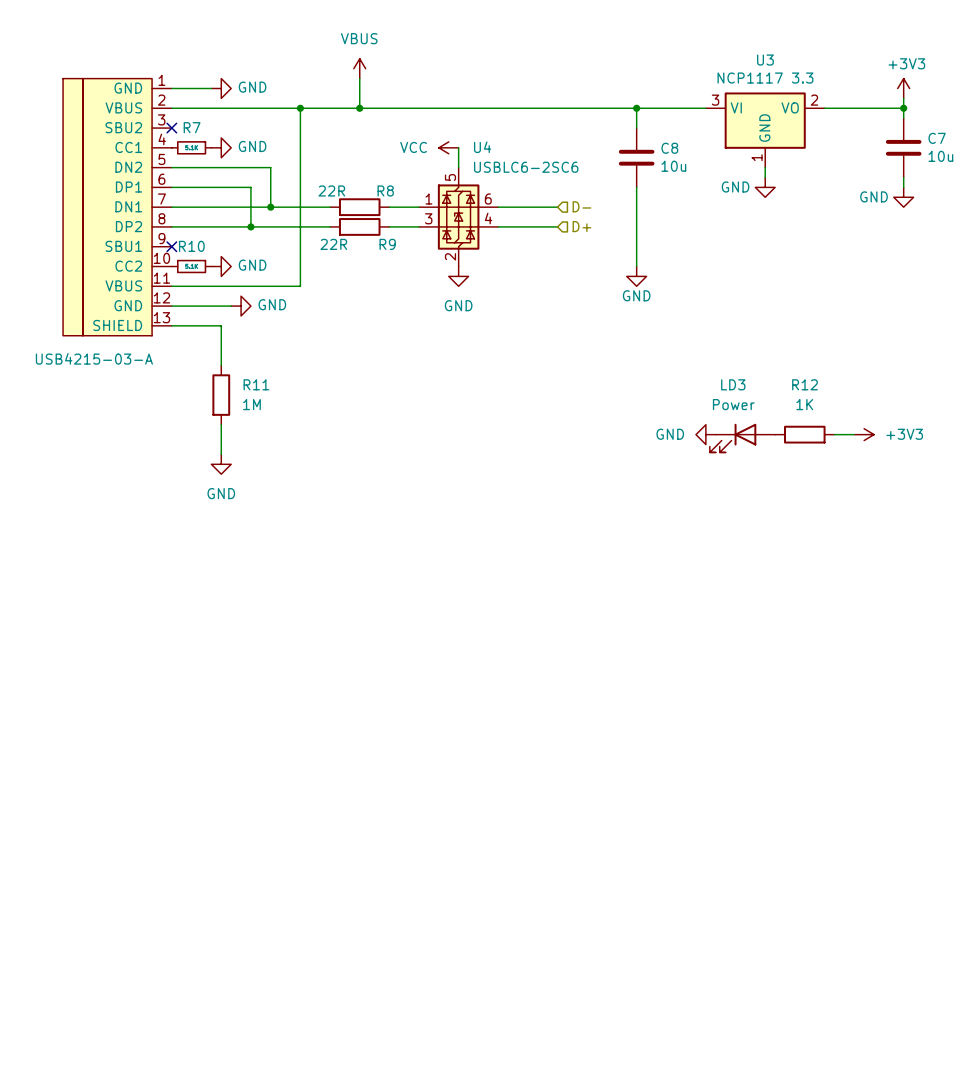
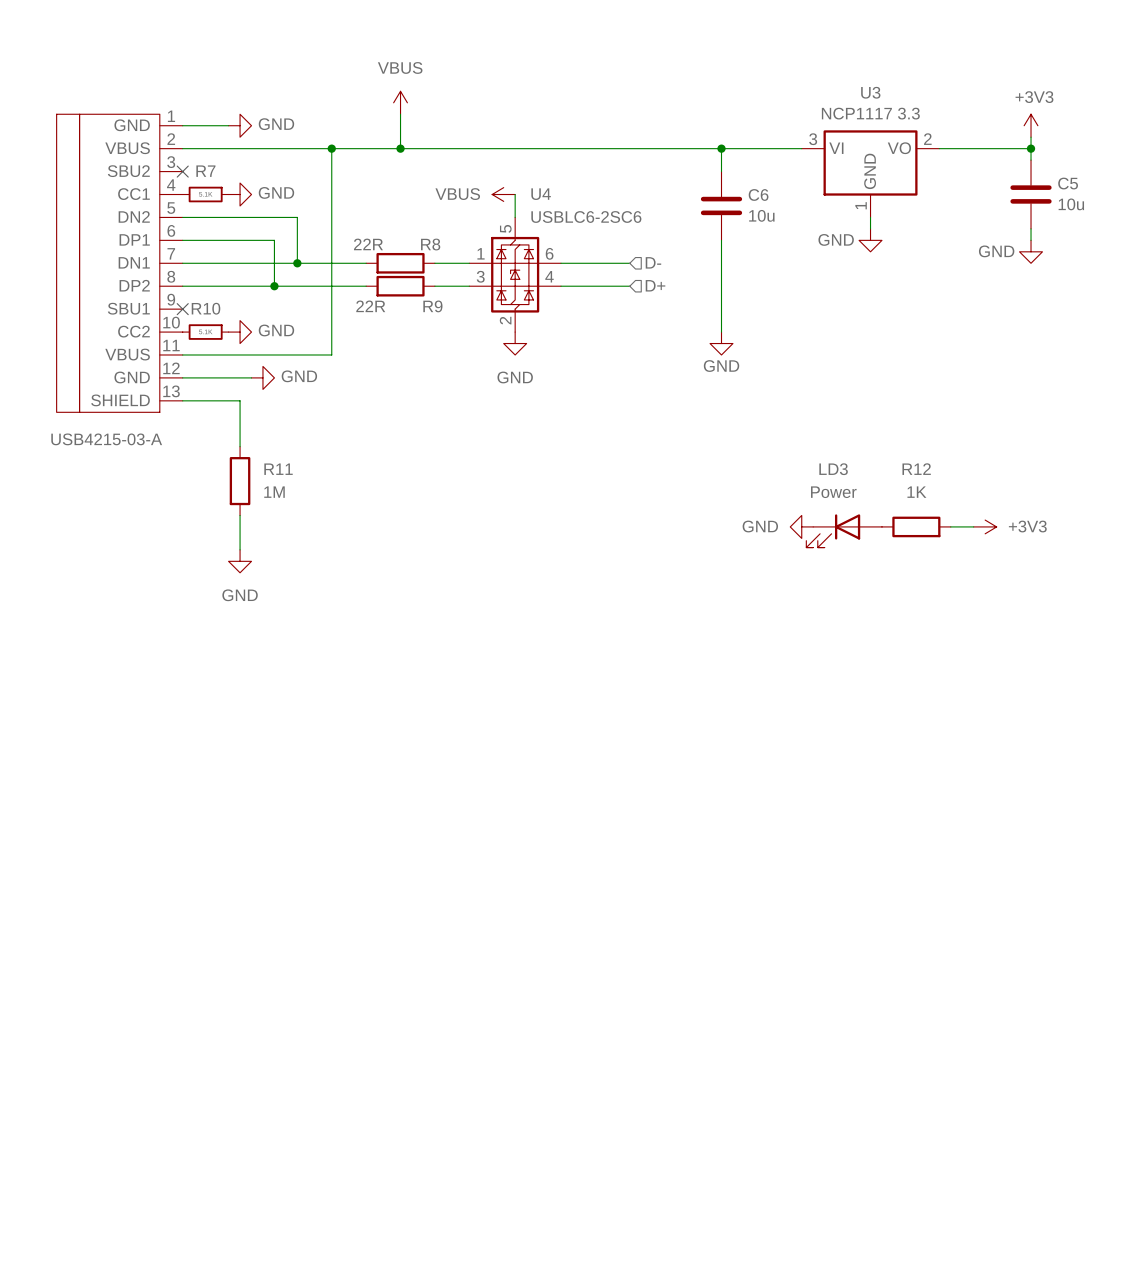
C7 name: C7 (937, 138) -> C5 (1068, 183)
power symbol: VCC (448, 147) -> VBUS (503, 194)
C8 name: C8 (669, 148) -> C6 (758, 194)

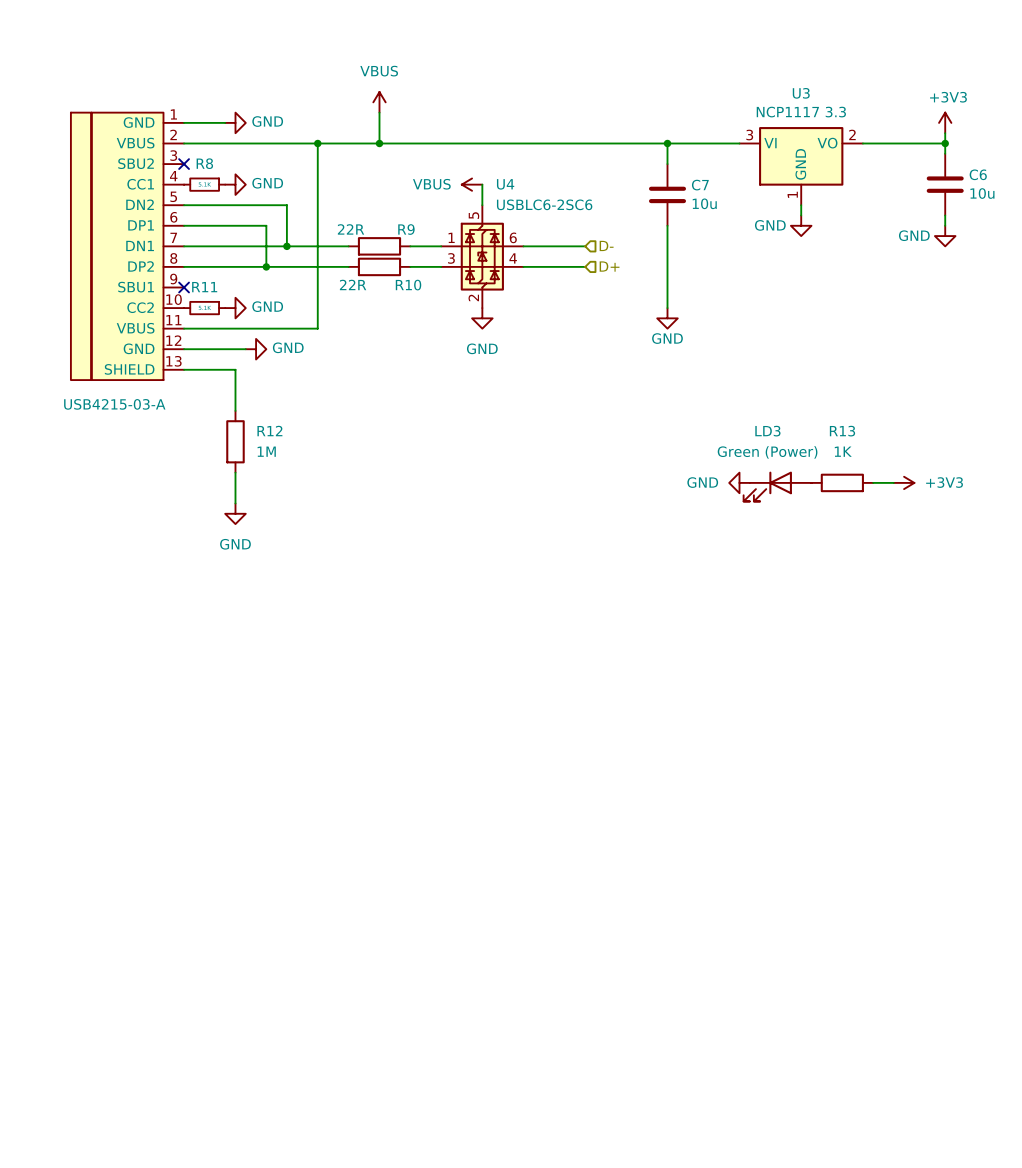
R7 name: R7 (205, 171) -> R8 (204, 163)
C5 name: C5 (1068, 183) -> C6 (978, 174)
C6 name: C6 (758, 194) -> C7 (700, 185)
R8 name: R8 (430, 244) -> R9 (406, 229)
R9 name: R9 (432, 306) -> R10 (408, 285)
R10 name: R10 (206, 308) -> R11 (204, 287)
R11 name: R11 (278, 469) -> R12 (269, 431)
R12 name: R12 (916, 469) -> R13 (842, 431)
LD3 value: Power (833, 492) -> Green (Power) (767, 452)

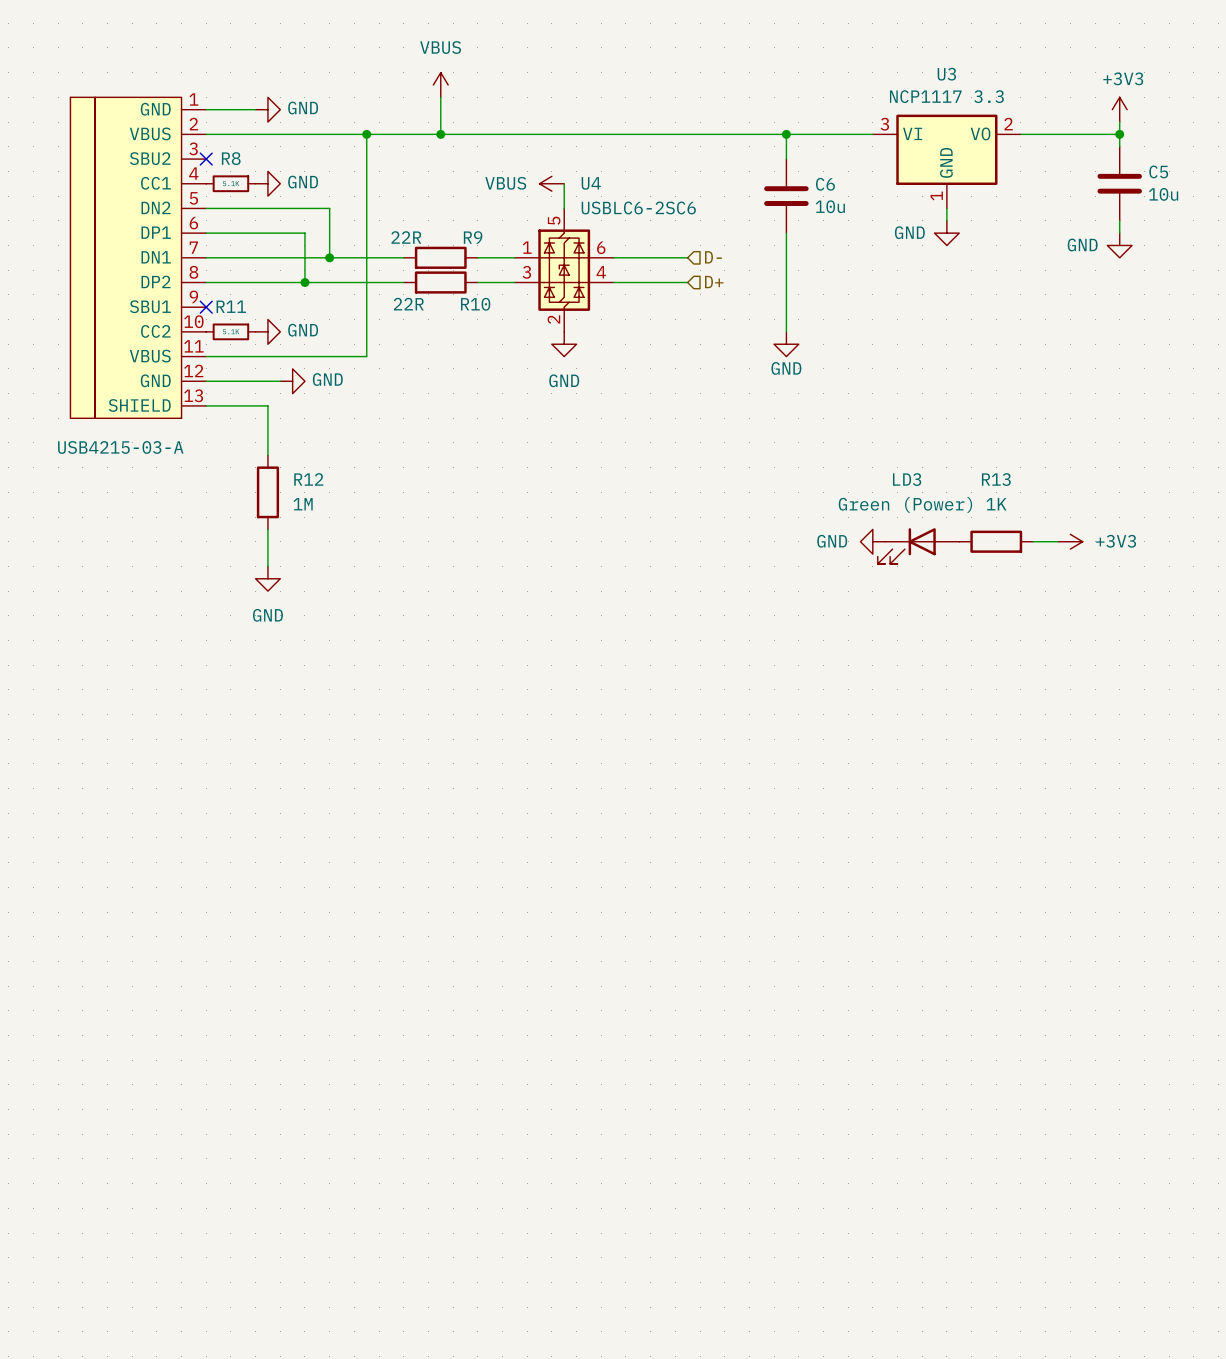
C6 name: C6 (978, 174) -> C5 (1158, 171)
C7 name: C7 (700, 185) -> C6 (825, 184)

